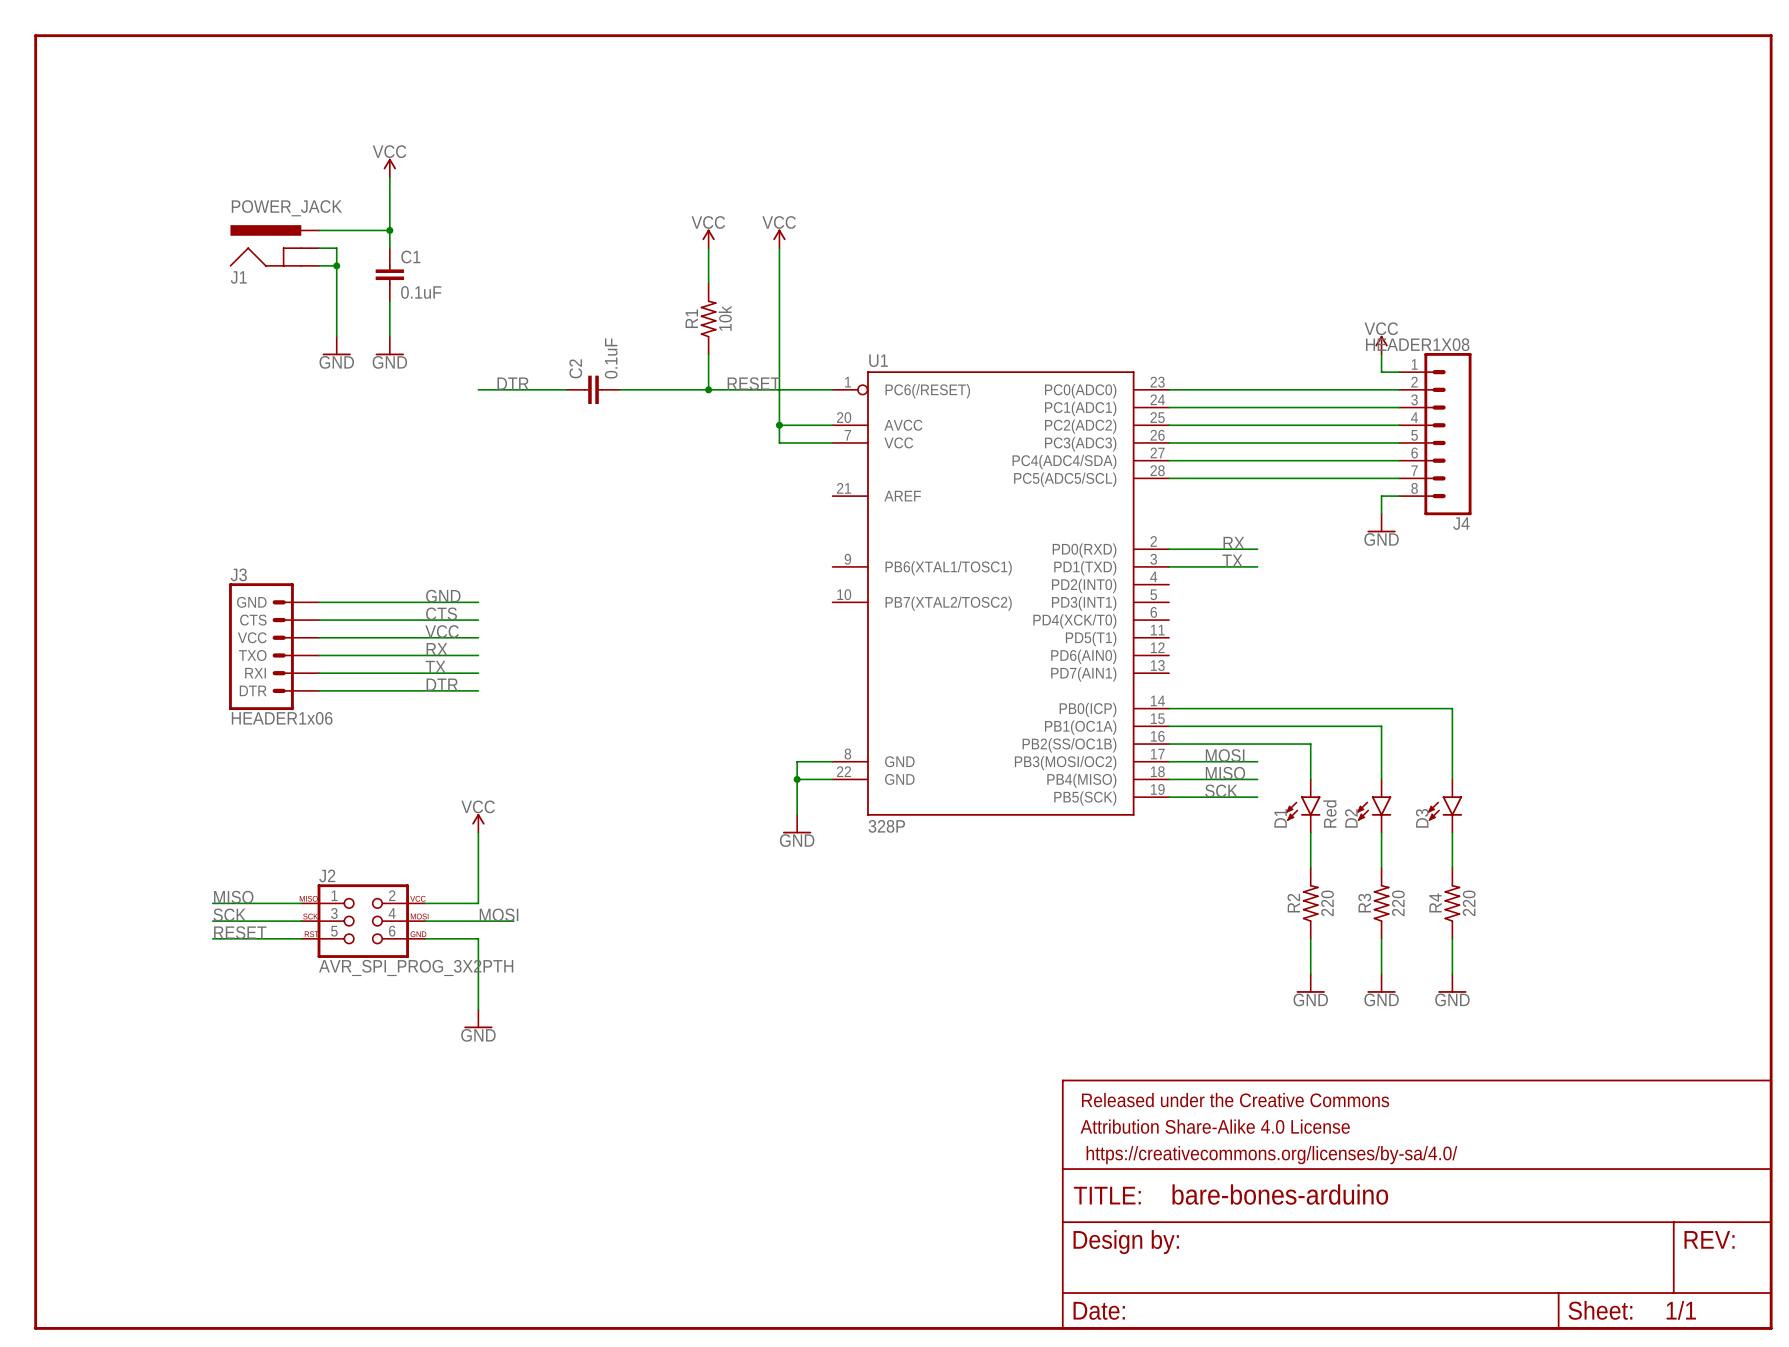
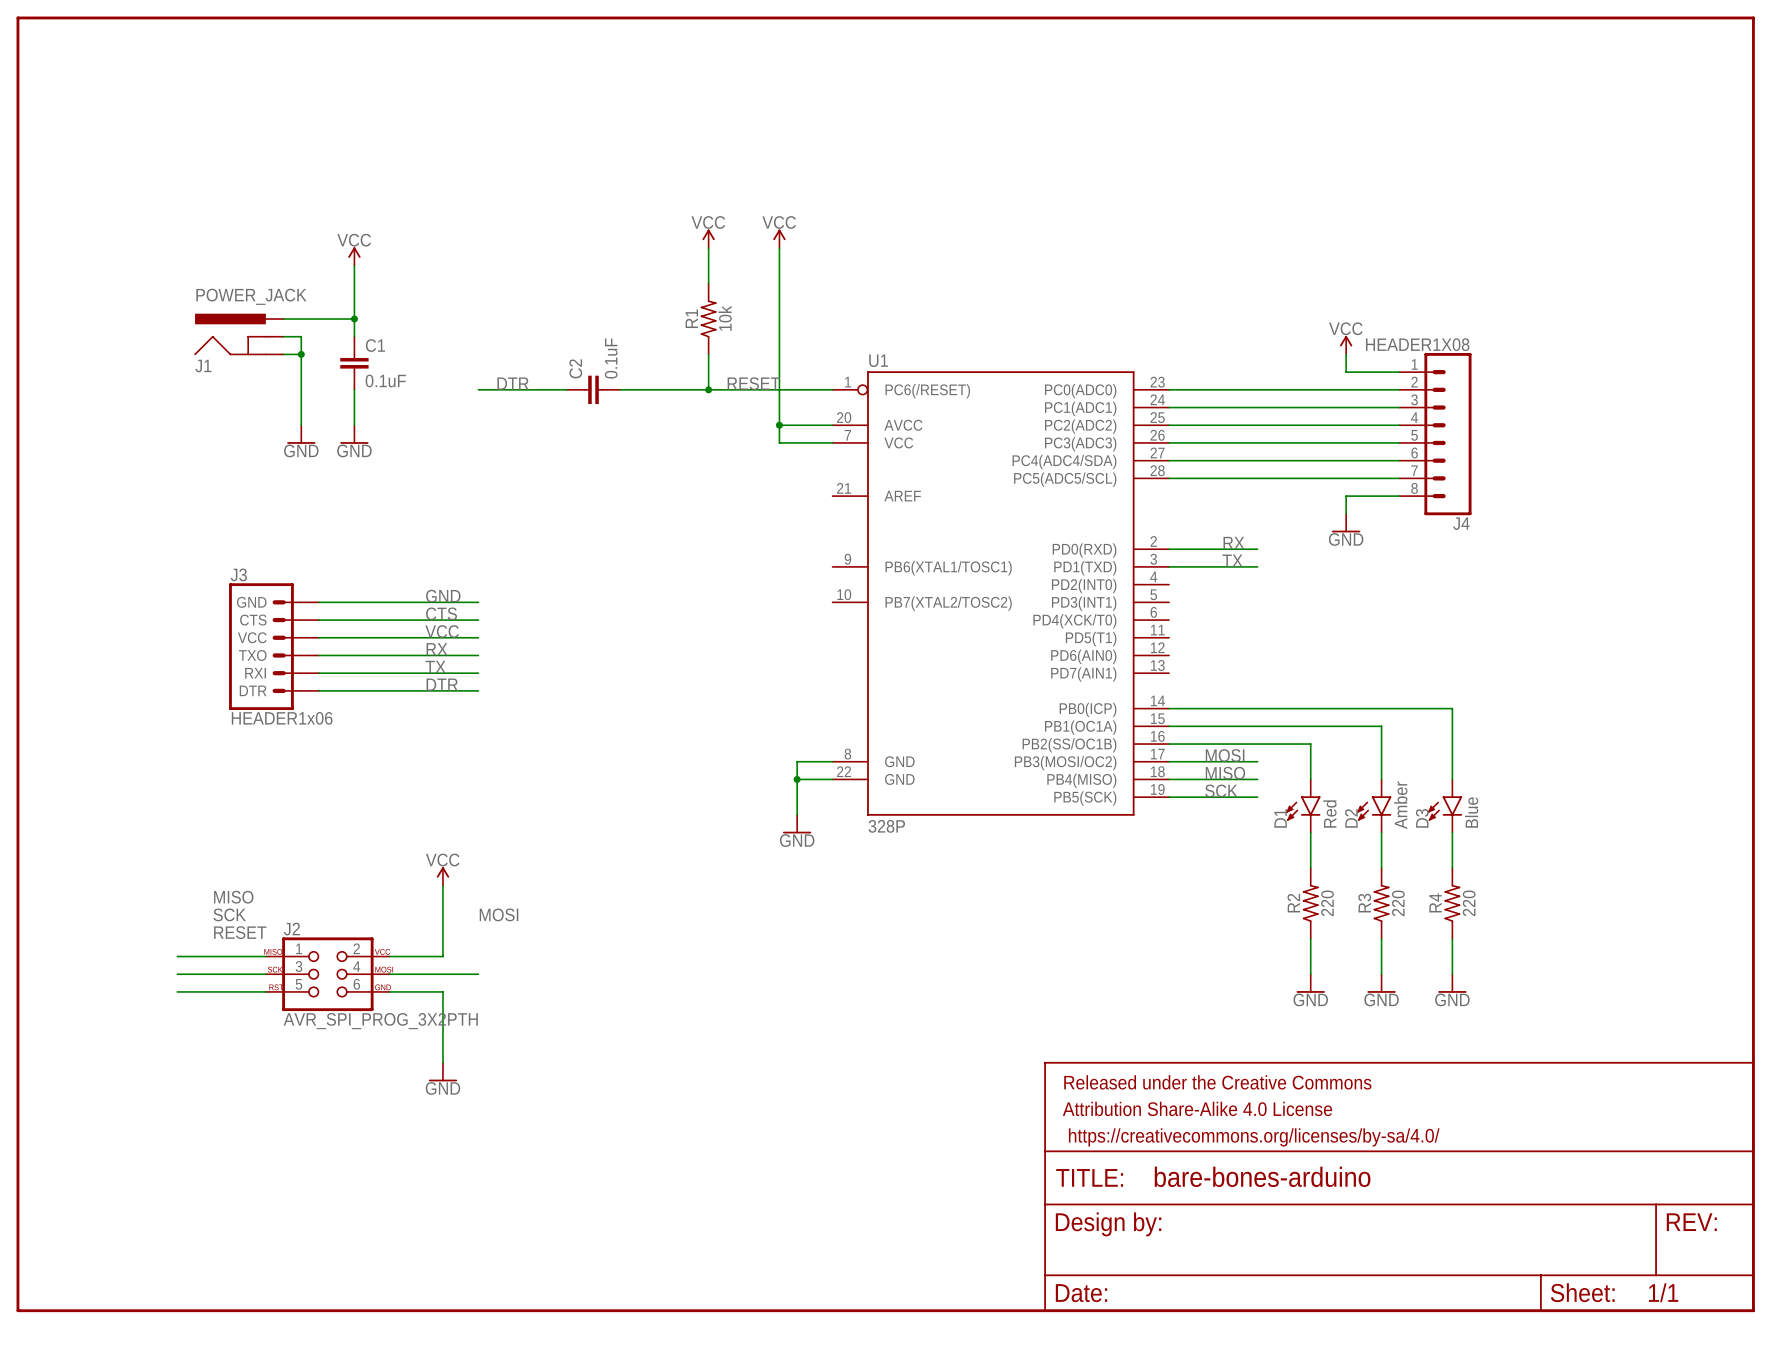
power symbol position: VCC (389, 168) -> VCC (354, 256)
wire: (389, 177) (389, 248) -> (354, 265) (354, 336)
wire: (319, 230) (389, 230) -> (283, 319) (354, 319)
junction: (389, 230) -> none
J1 position: (274, 245) -> (239, 334)
wire: (319, 248) (336, 248) (336, 336) -> (283, 336) (301, 336) (301, 425)
wire: (319, 265) (336, 265) -> (283, 354) (301, 354)
junction: (336, 265) -> none
C1 position: (389, 274) -> (354, 363)
wire: (389, 301) (389, 336) -> (354, 389) (354, 425)
junction: none -> (354, 319)
power symbol position: VCC (1381, 345) -> VCC (1346, 345)
power symbol: GND (336, 346) -> none
power symbol: GND (389, 346) -> none
junction: none -> (301, 354)
wire: (1381, 354) (1381, 372) -> (1346, 354) (1346, 372) (1381, 372)
power symbol: none -> GND (301, 434)
power symbol: none -> GND (354, 434)
wire: (1381, 496) (1381, 513) -> (1381, 496) (1346, 496) (1346, 513)
power symbol position: GND (1381, 523) -> GND (1346, 523)
part position: (903, 682) -> (885, 664)
D2 value: none -> Amber (1400, 805)
D3 value: none -> Blue (1471, 812)
power symbol position: VCC (478, 823) -> VCC (442, 876)
wire: (478, 832) (478, 903) (425, 903) -> (442, 885) (442, 956) (389, 956)
wire: (212, 903) (301, 903) -> (177, 956) (265, 956)
wire: (212, 921) (301, 921) -> (177, 974) (265, 974)
J2 position: (363, 921) -> (327, 974)
wire: (425, 921) (513, 921) -> (389, 974) (478, 974)
wire: (212, 938) (301, 938) -> (177, 991) (265, 991)
wire: (425, 938) (478, 938) (478, 1009) -> (389, 991) (442, 991) (442, 1062)
power symbol position: GND (478, 1018) -> GND (442, 1072)
part position: (1416, 1204) -> (1399, 1186)

